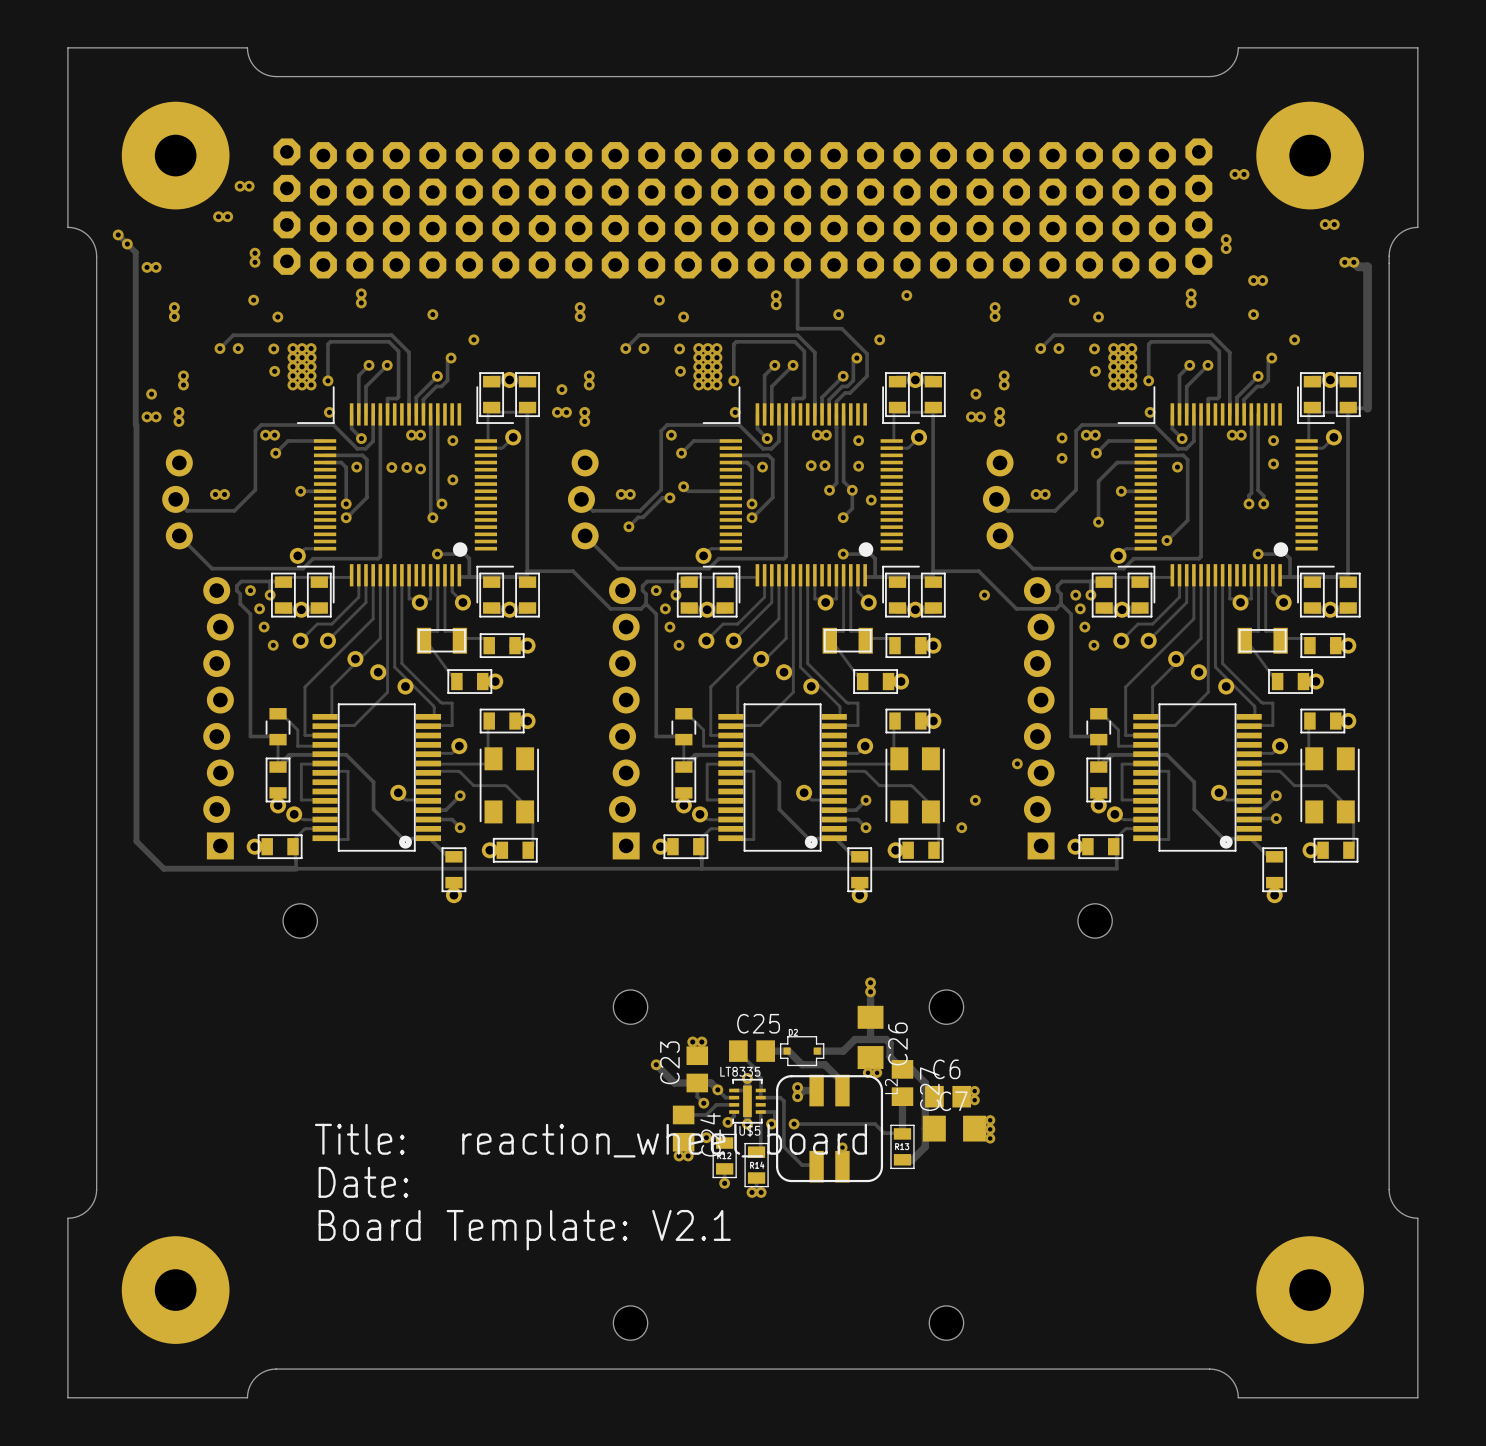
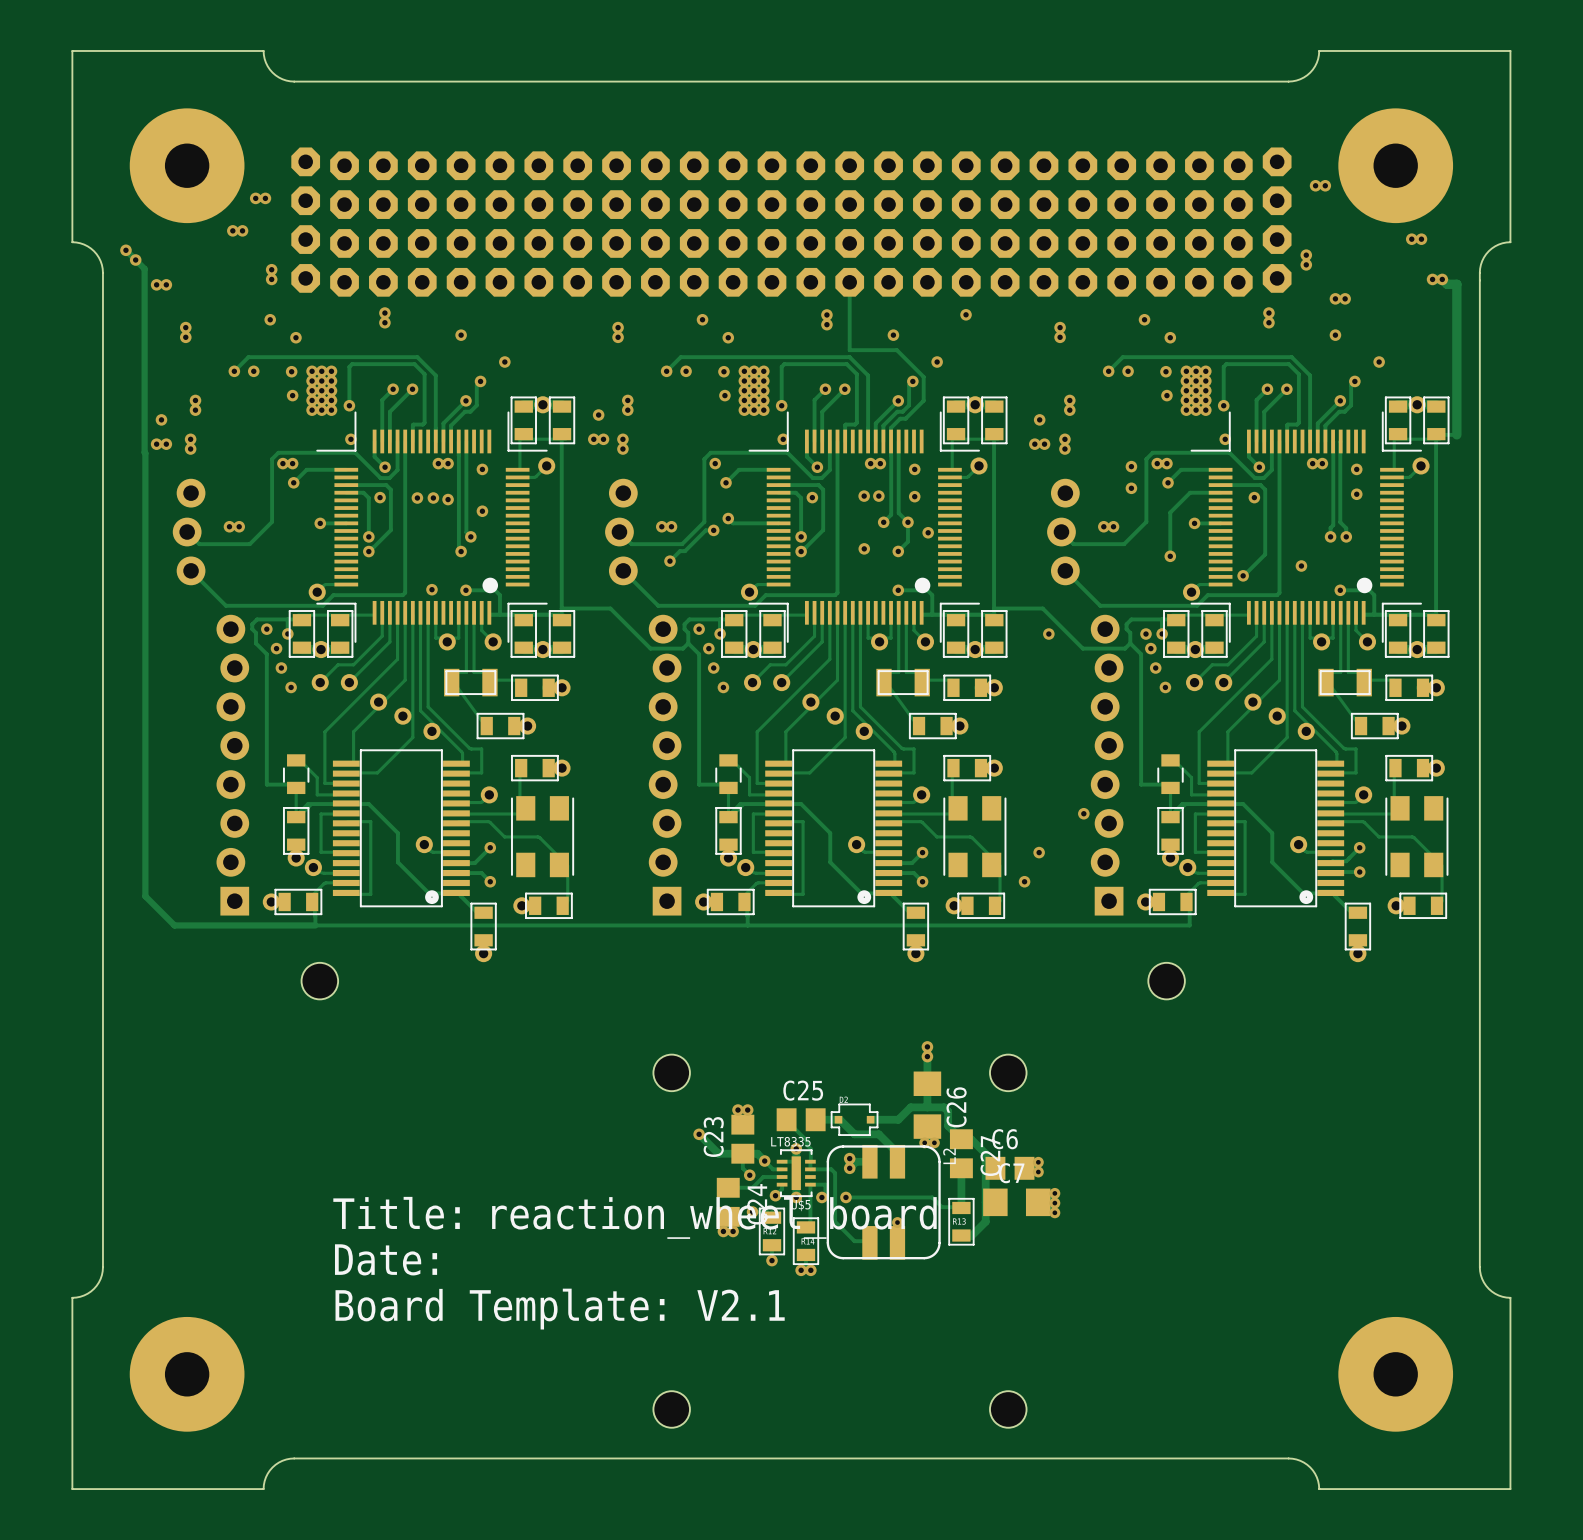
via: none -> (864, 548)
via: none -> (1301, 566)
via: none -> (431, 589)

